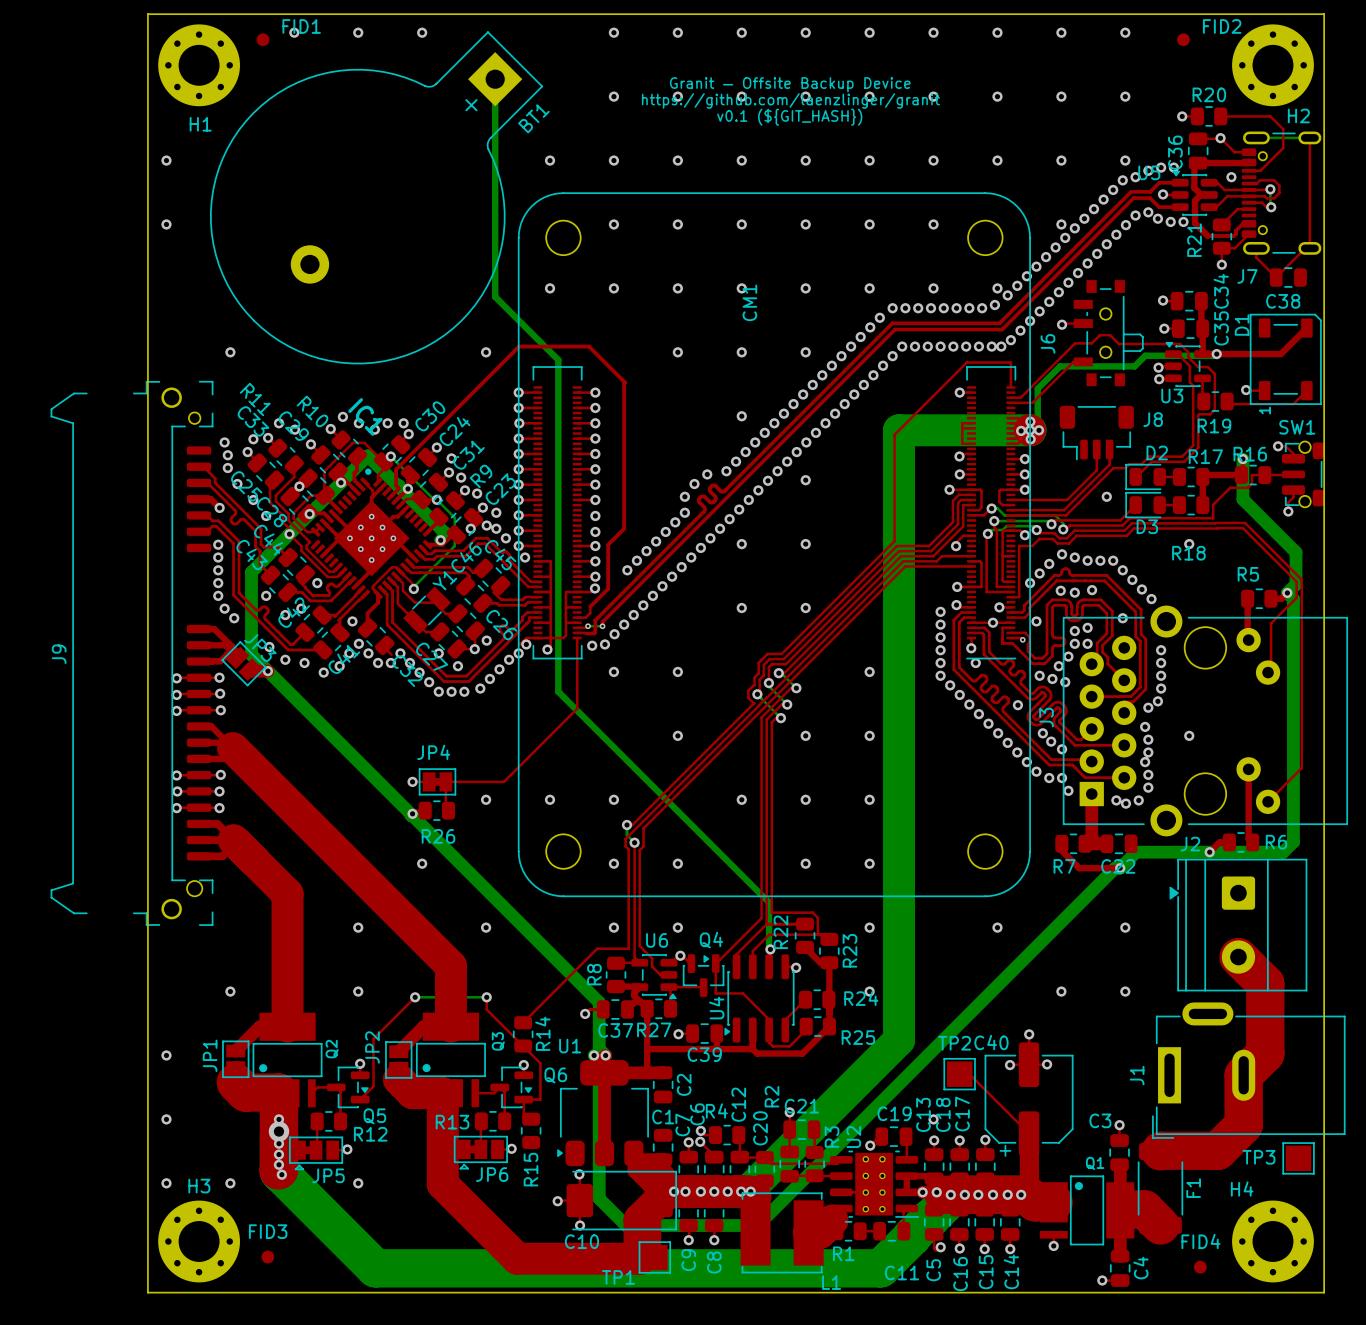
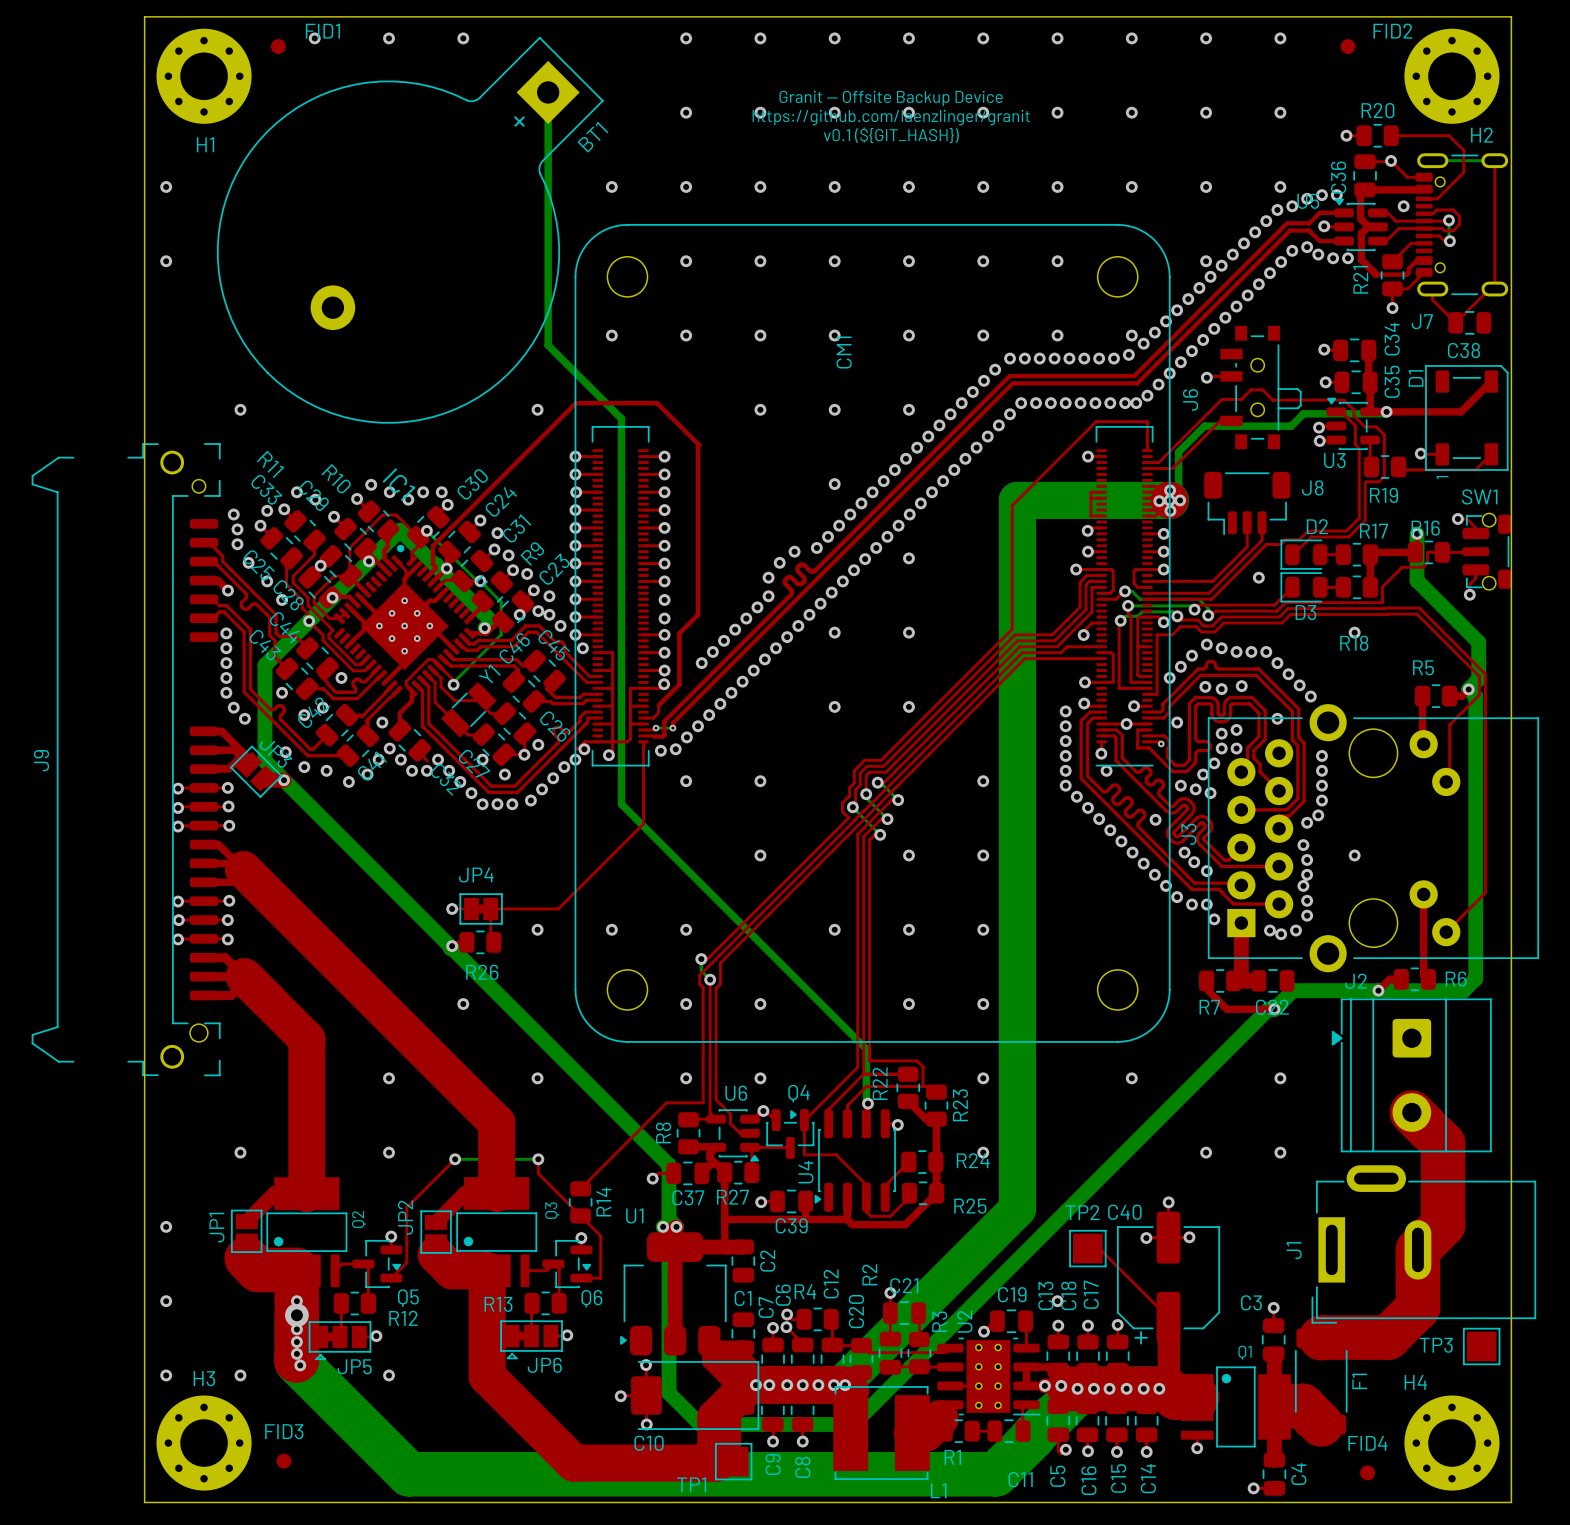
Q6 name position: Q6 (555, 1075) -> Q6 (591, 1298)
top track: (523, 1099) (523, 1117) (527, 1121) -> none
R15: (531, 1130) -> none

